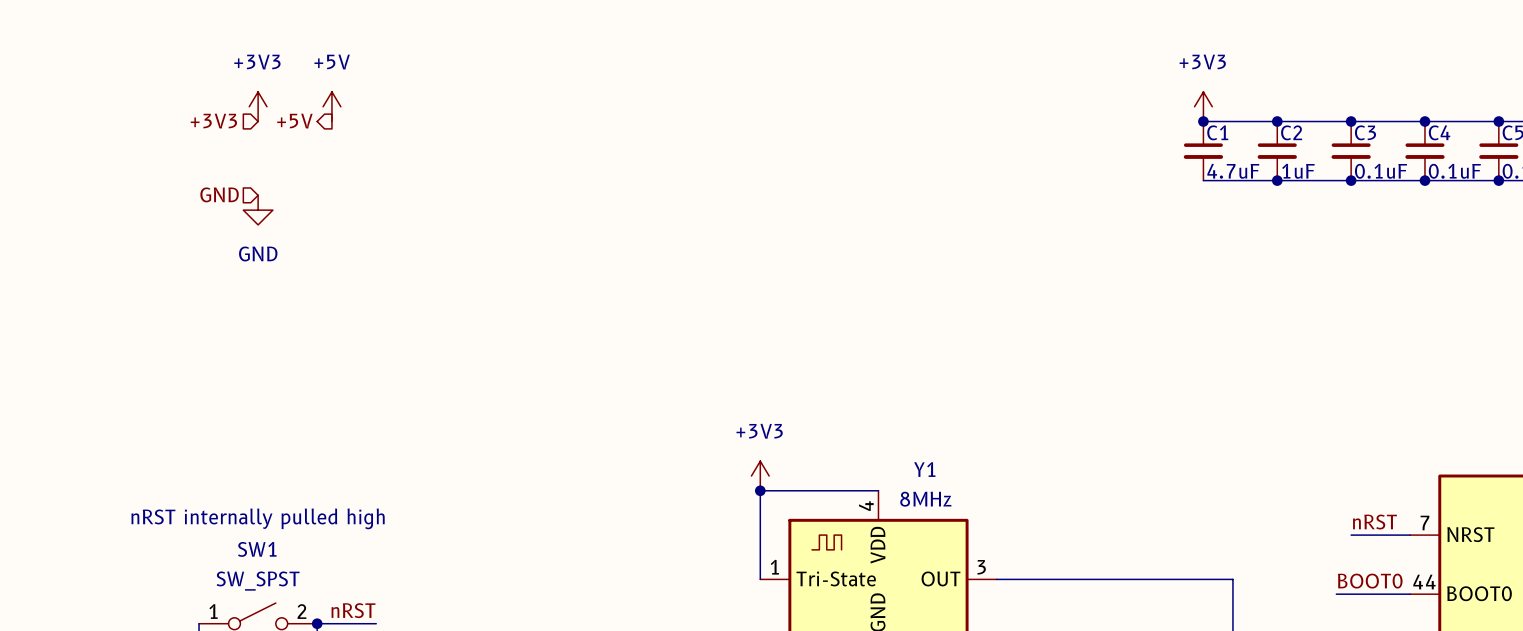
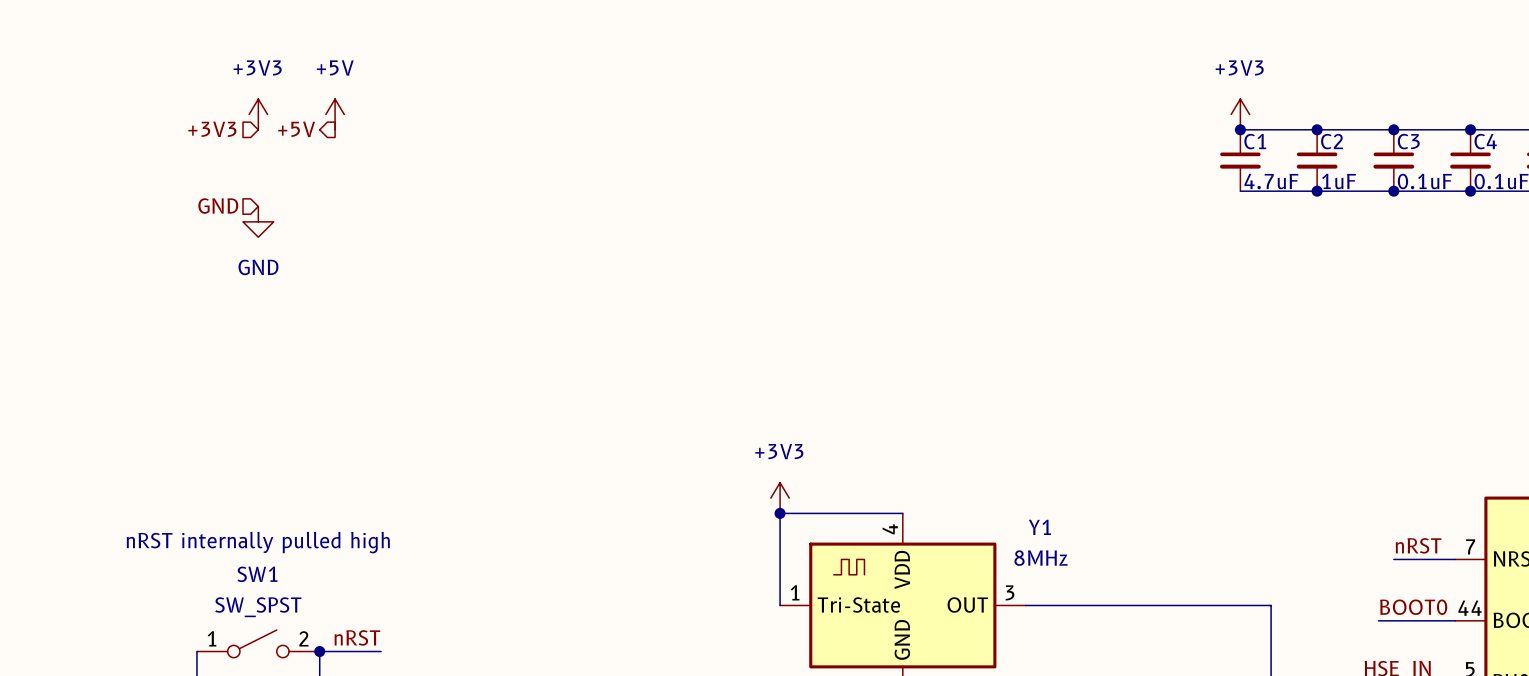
Y1 name position: Y1 (924, 469) -> Y1 (1039, 527)
Y1 value position: 8MHz (925, 499) -> 8MHz (1041, 558)

